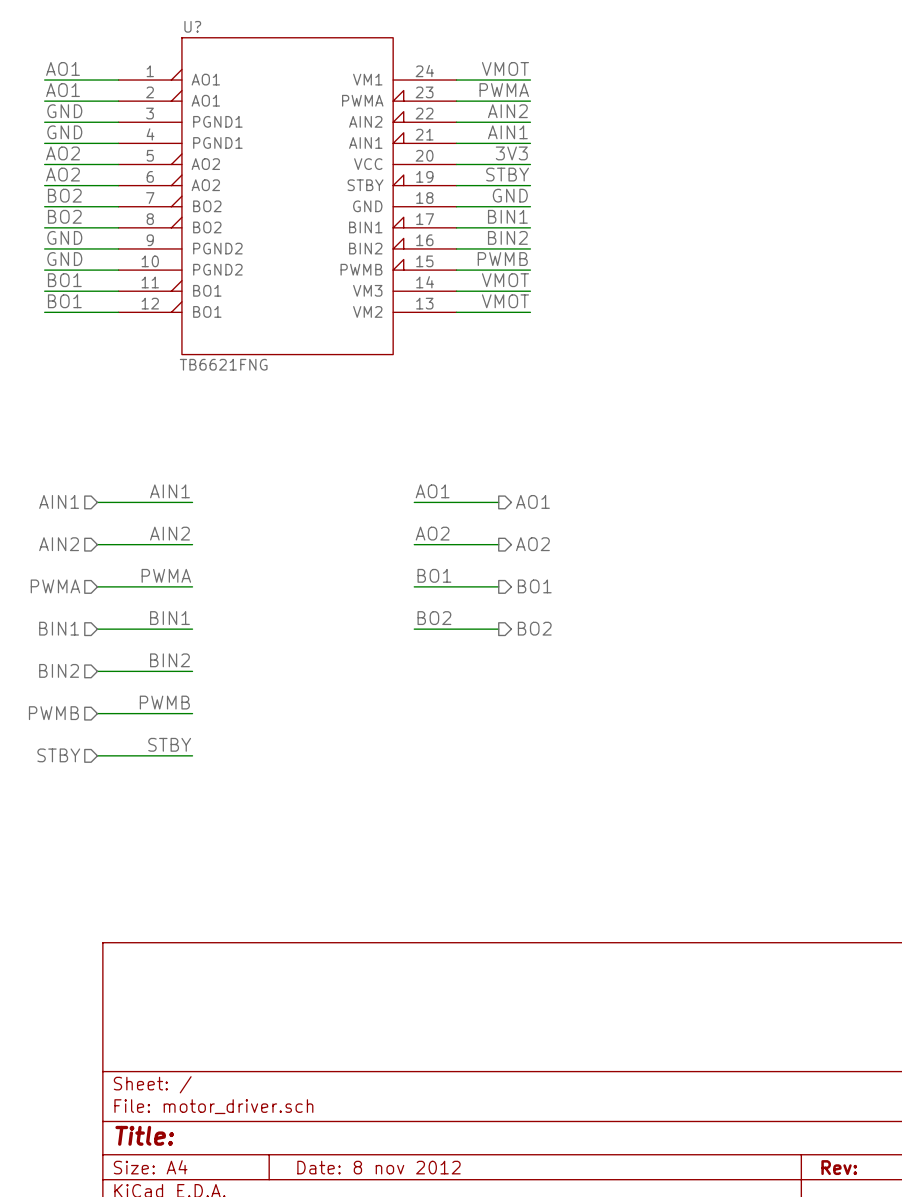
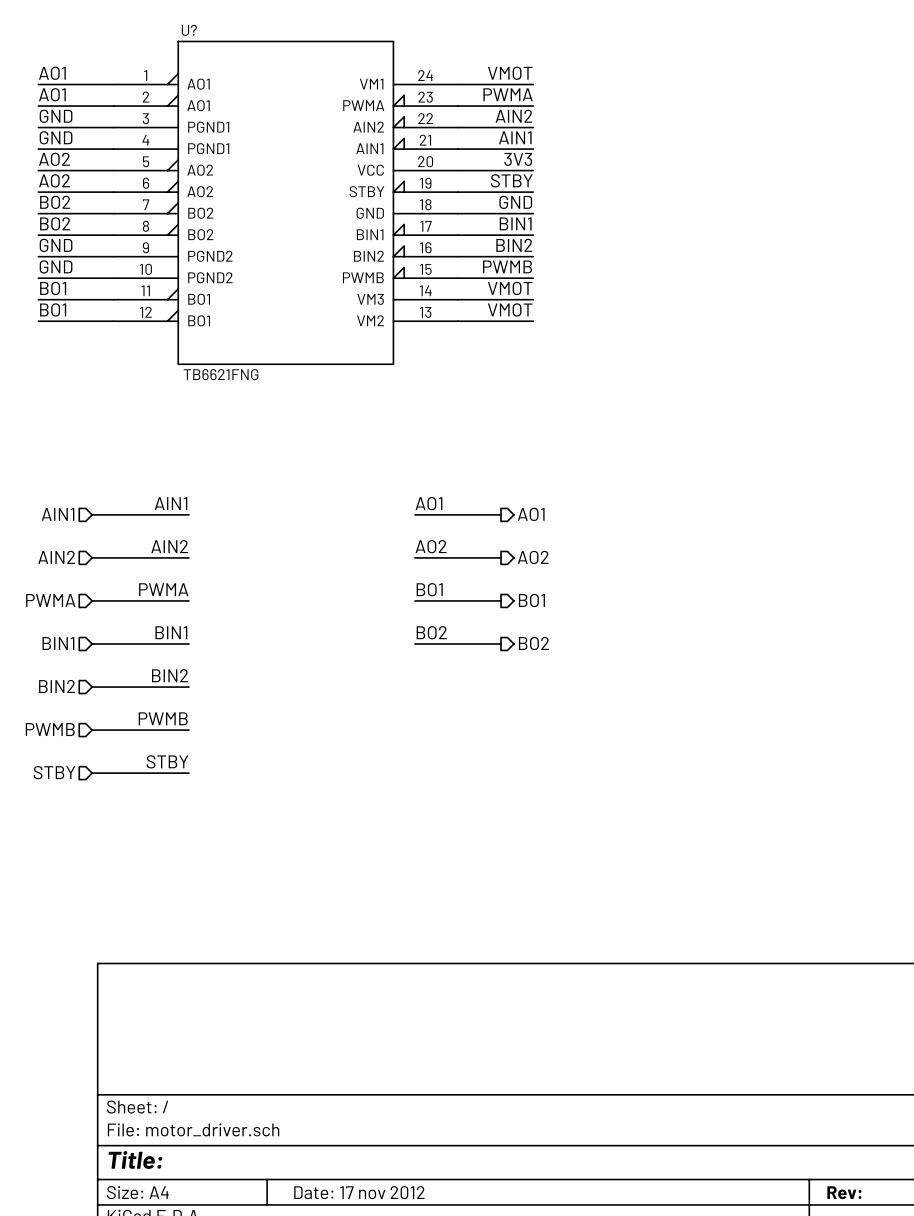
title block: Date: 8 nov 2012 (379, 1167) -> Date: 17 nov 2012 (359, 1192)

